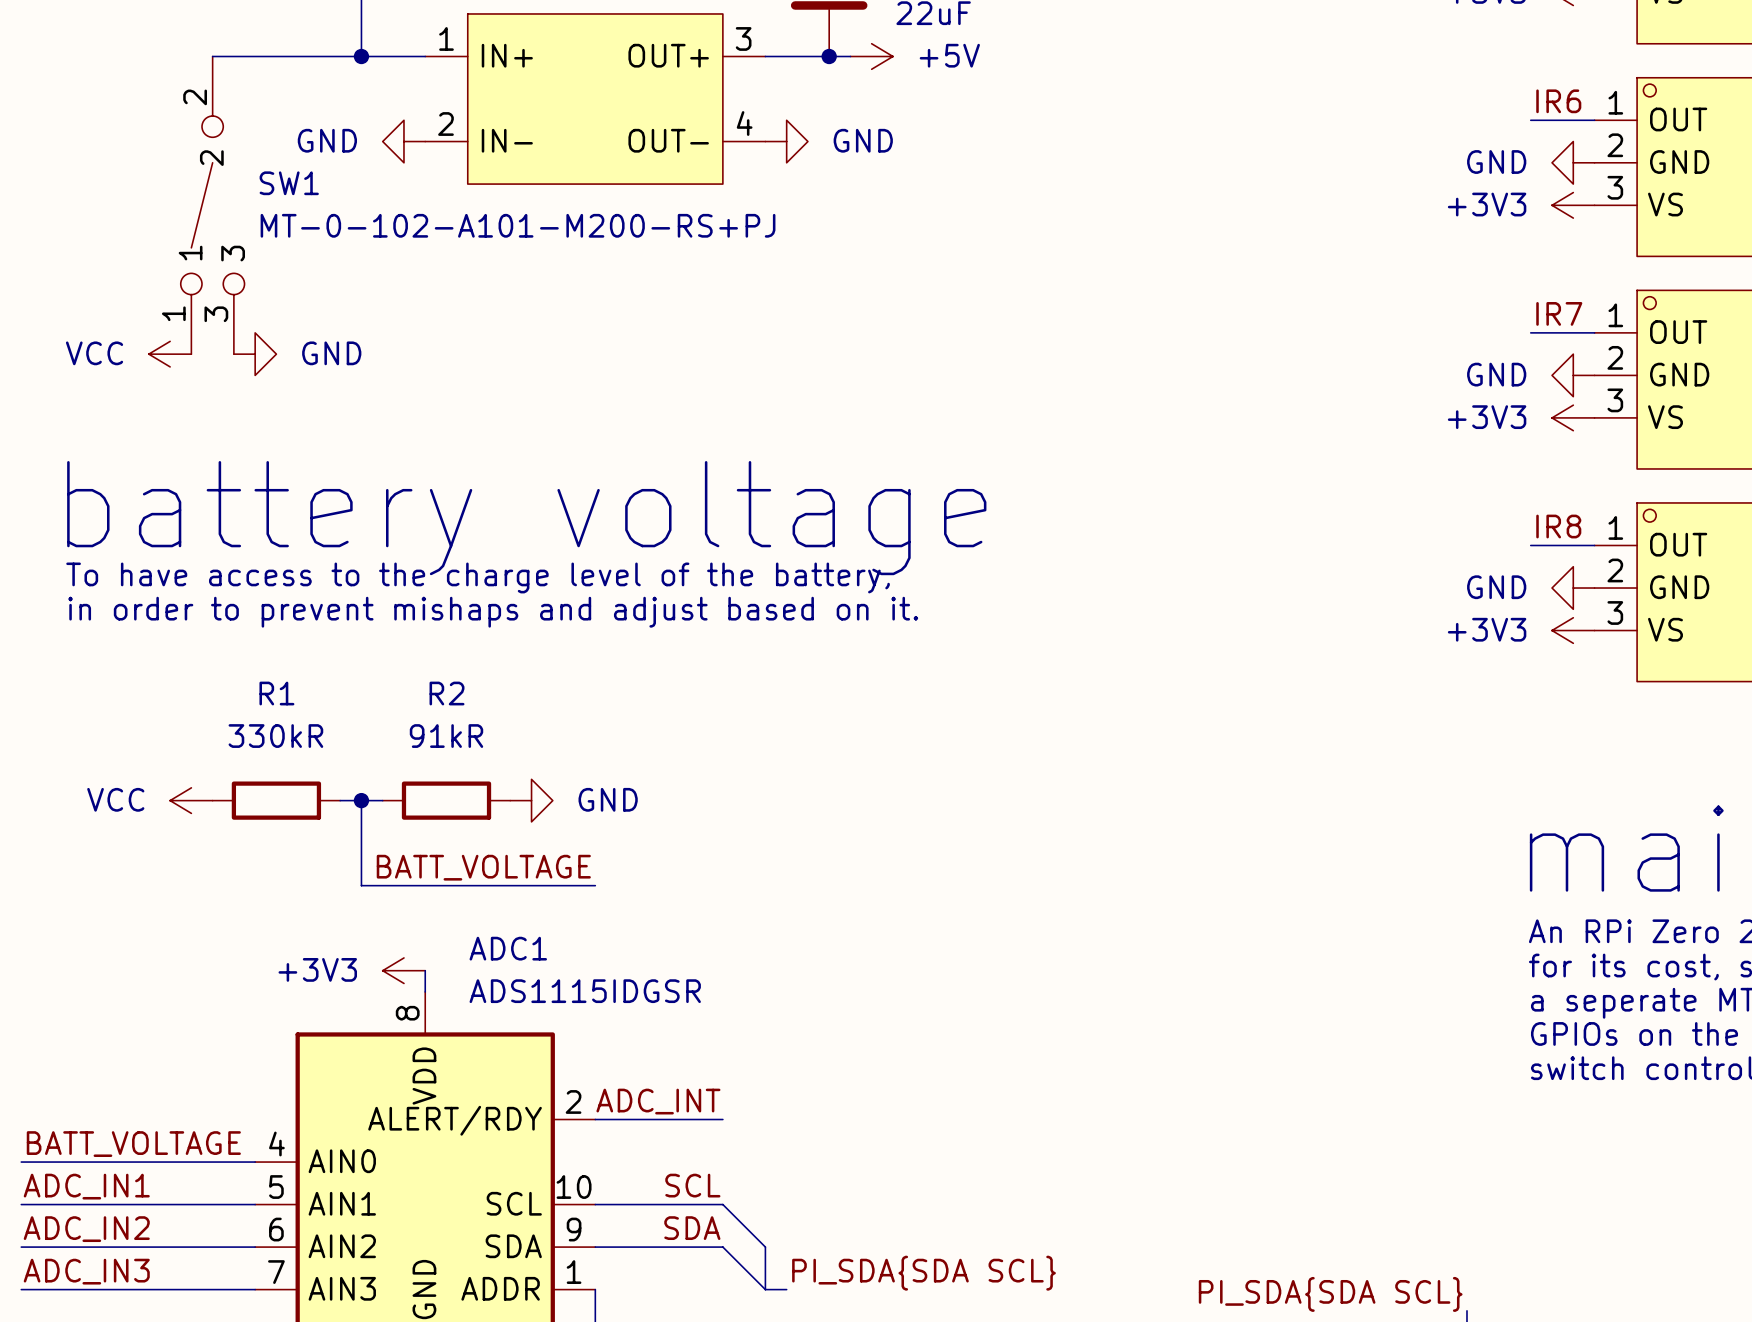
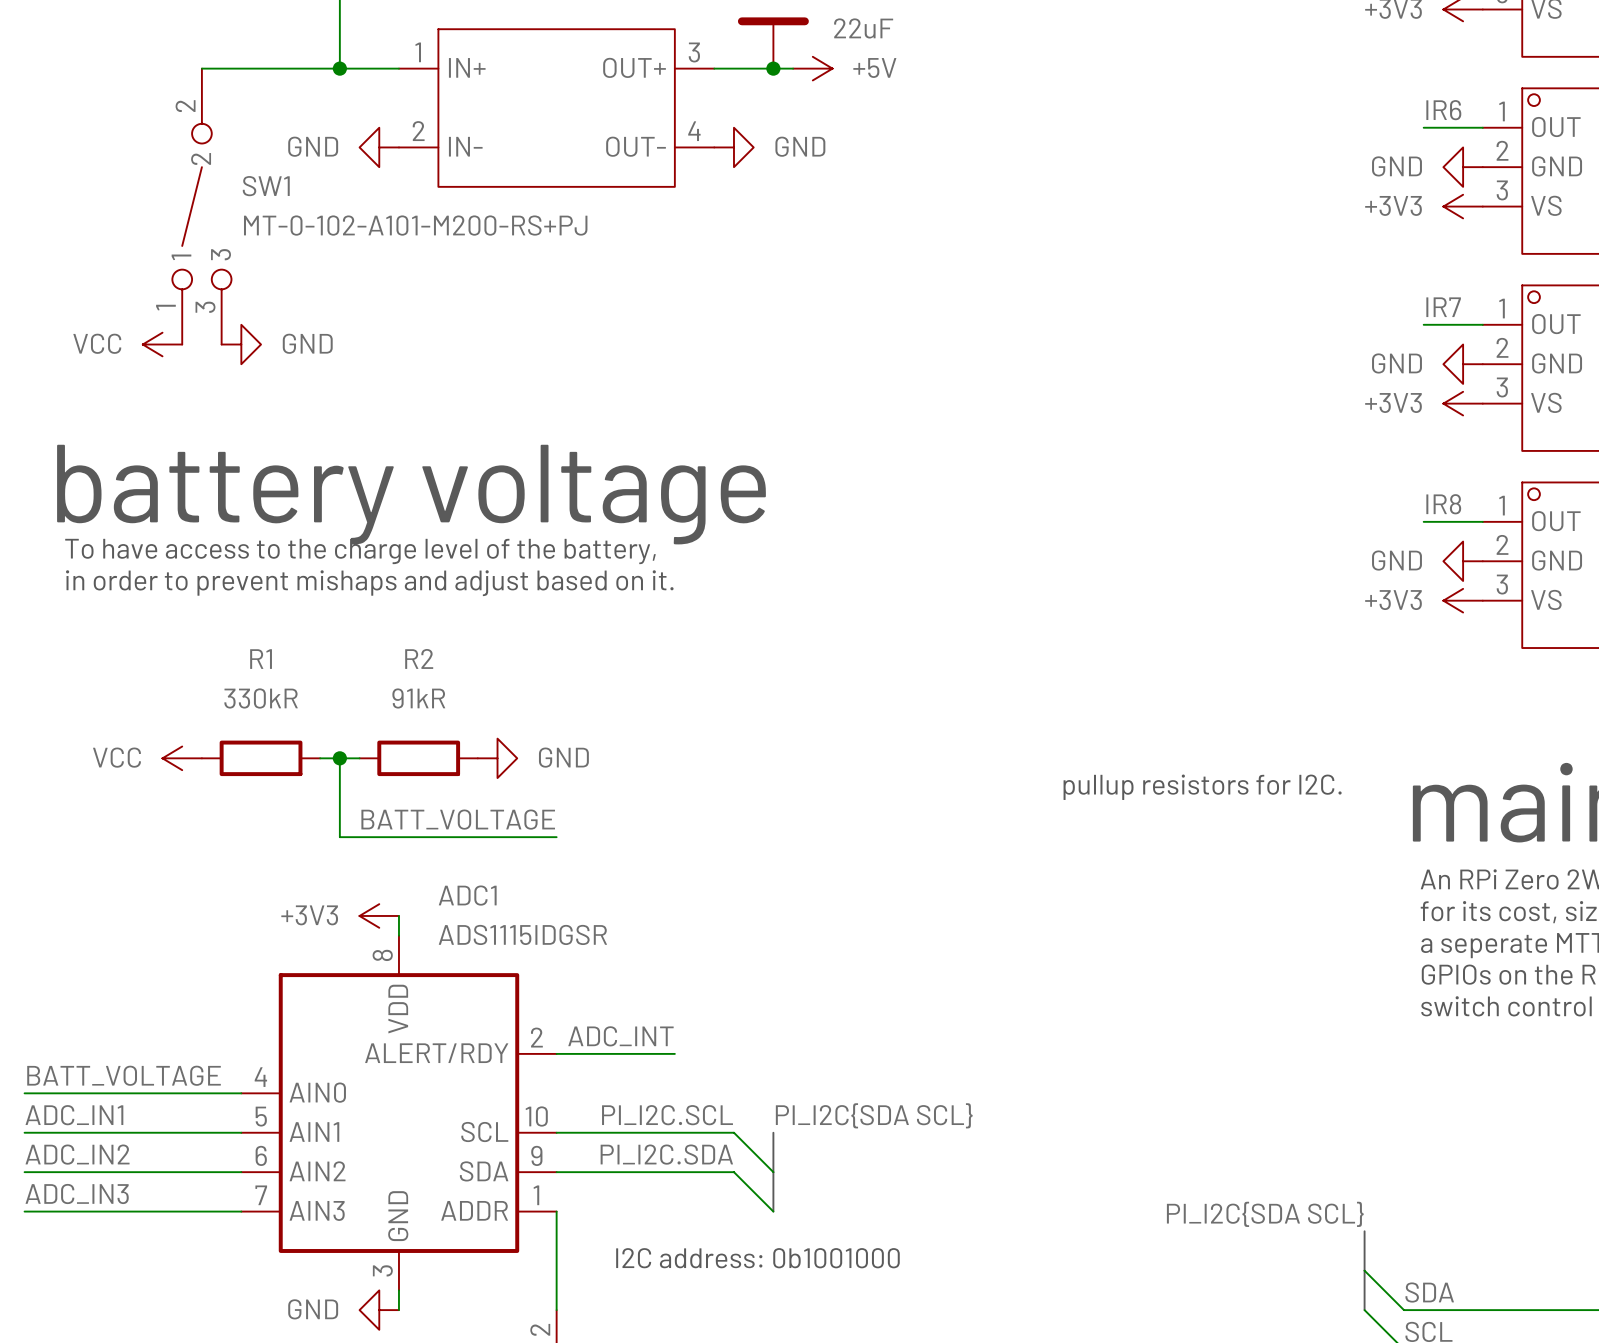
text: none -> pullup resistors for I2C. (1202, 787)
label: SCL (692, 1185) -> none
label: none -> PI_I2C.SCL (667, 1115)
label: none -> PI_I2C{SDA SCL} (874, 1115)
wire: (722, 1204) (765, 1247) -> (674, 1132) (733, 1132) (773, 1172)
bus: none -> (773, 1132) (773, 1211)
label: SDA (692, 1228) -> none
label: none -> PI_I2C.SDA (666, 1154)
wire: (722, 1247) (765, 1289) -> (674, 1172) (733, 1172) (773, 1211)
bus: (765, 1247) (765, 1289) (786, 1289) -> none
label: PI_SDA{SDA SCL} (924, 1273) -> none
label: PI_SDA{SDA SCL} (1330, 1294) -> PI_I2C{SDA SCL} (1265, 1214)

